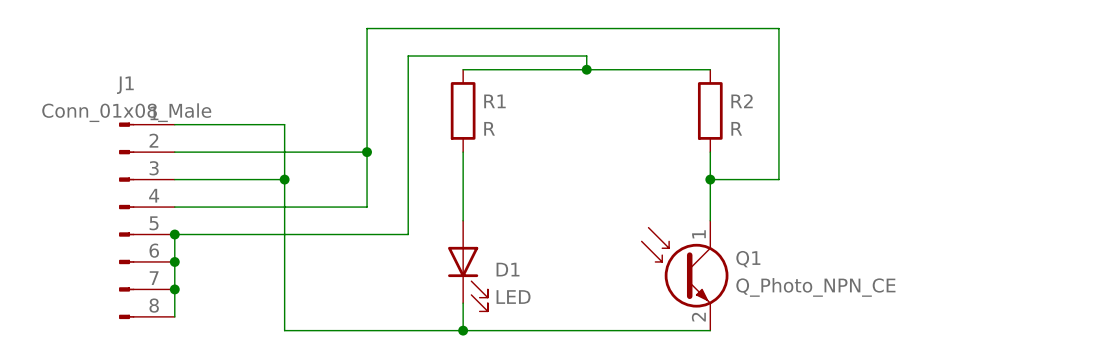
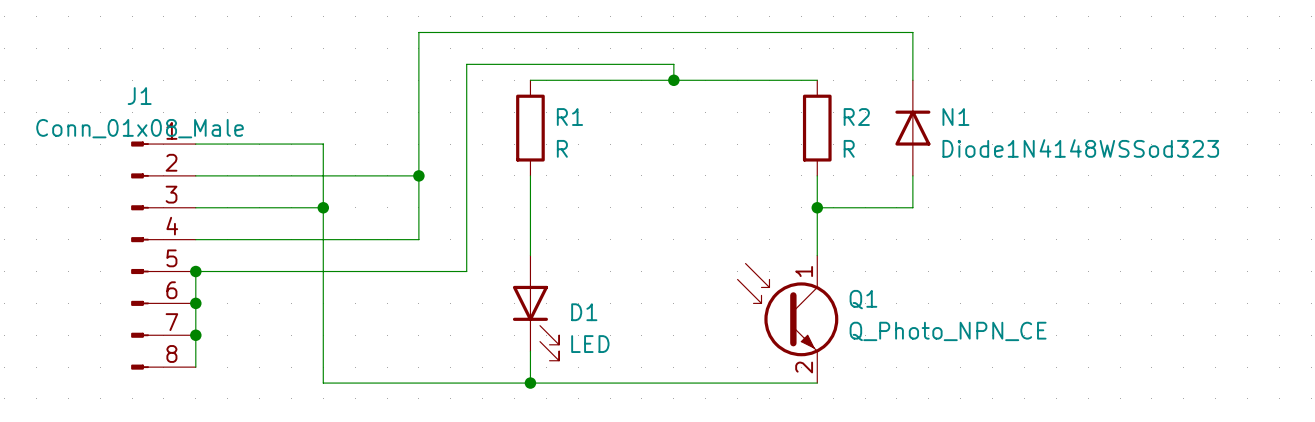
wire: (778, 28) (778, 179) -> (896, 32) (912, 32) (912, 80)
N1: none -> Diode1N4148WSSod323 (912, 128)
wire: none -> (912, 175) (912, 207) (896, 207)

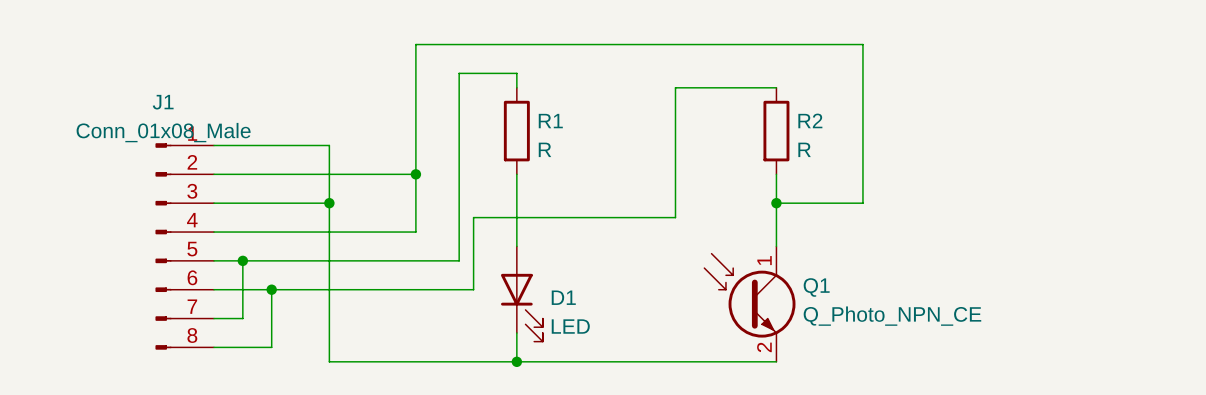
wire: (530, 64) (673, 64) (673, 80) -> (516, 73) (516, 87)
wire: (530, 80) (705, 80) -> (214, 289) (473, 289) (473, 217) (675, 217) (675, 87)
junction: (673, 80) -> none
N1: Diode1N4148WSSod323 (912, 128) -> none
wire: (195, 271) (195, 367) -> (271, 289) (271, 347) (214, 347)
junction: (195, 271) -> none
wire: none -> (242, 260) (242, 318) (214, 318)
junction: none -> (242, 260)
junction: (195, 303) -> none
junction: none -> (271, 289)
junction: (195, 335) -> none

